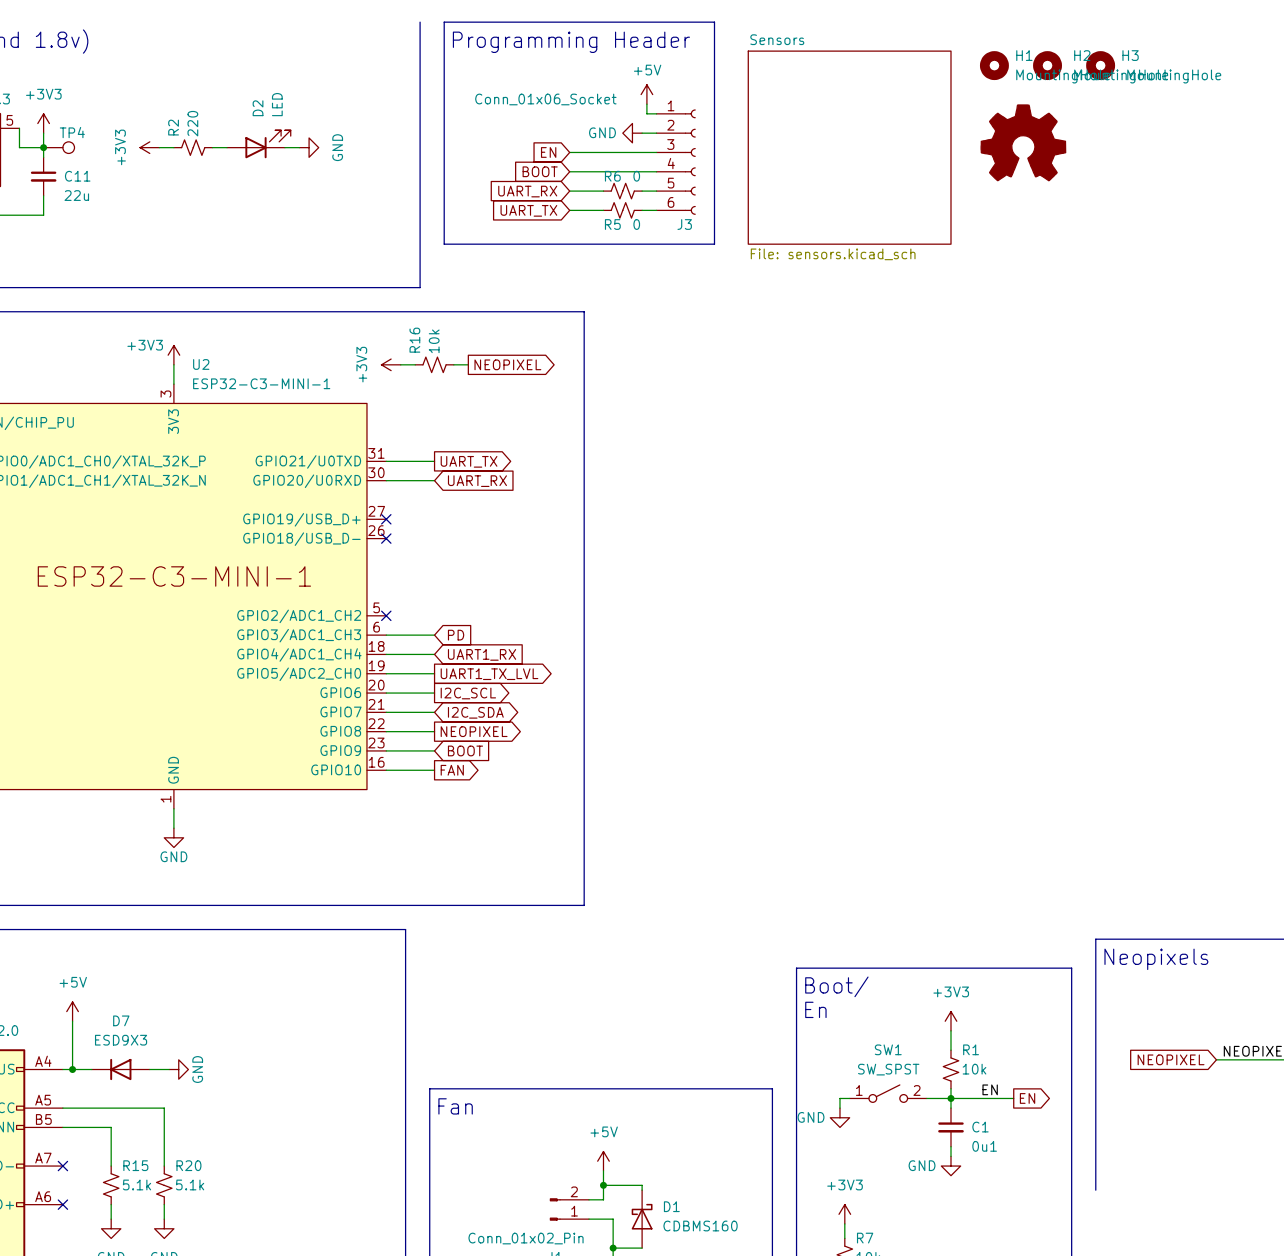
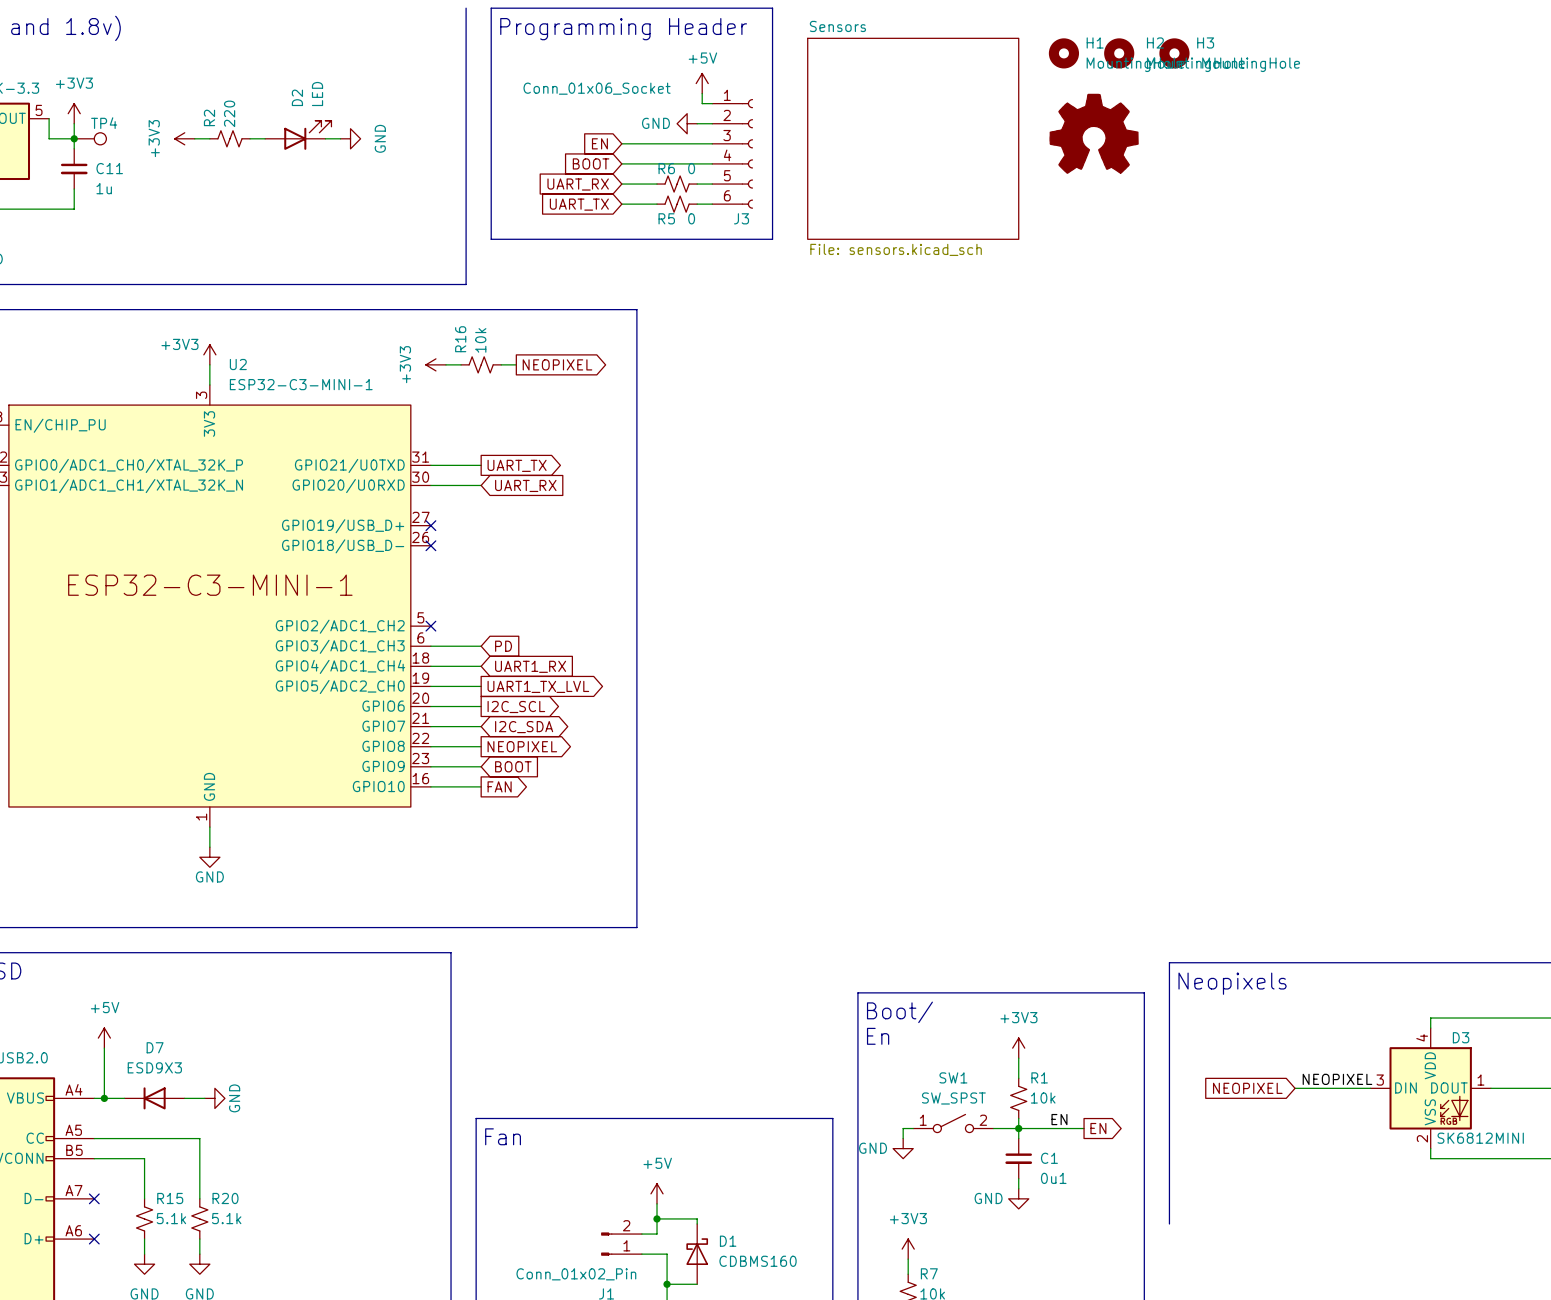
C11 value: 22u (76, 195) -> 1u (104, 188)

